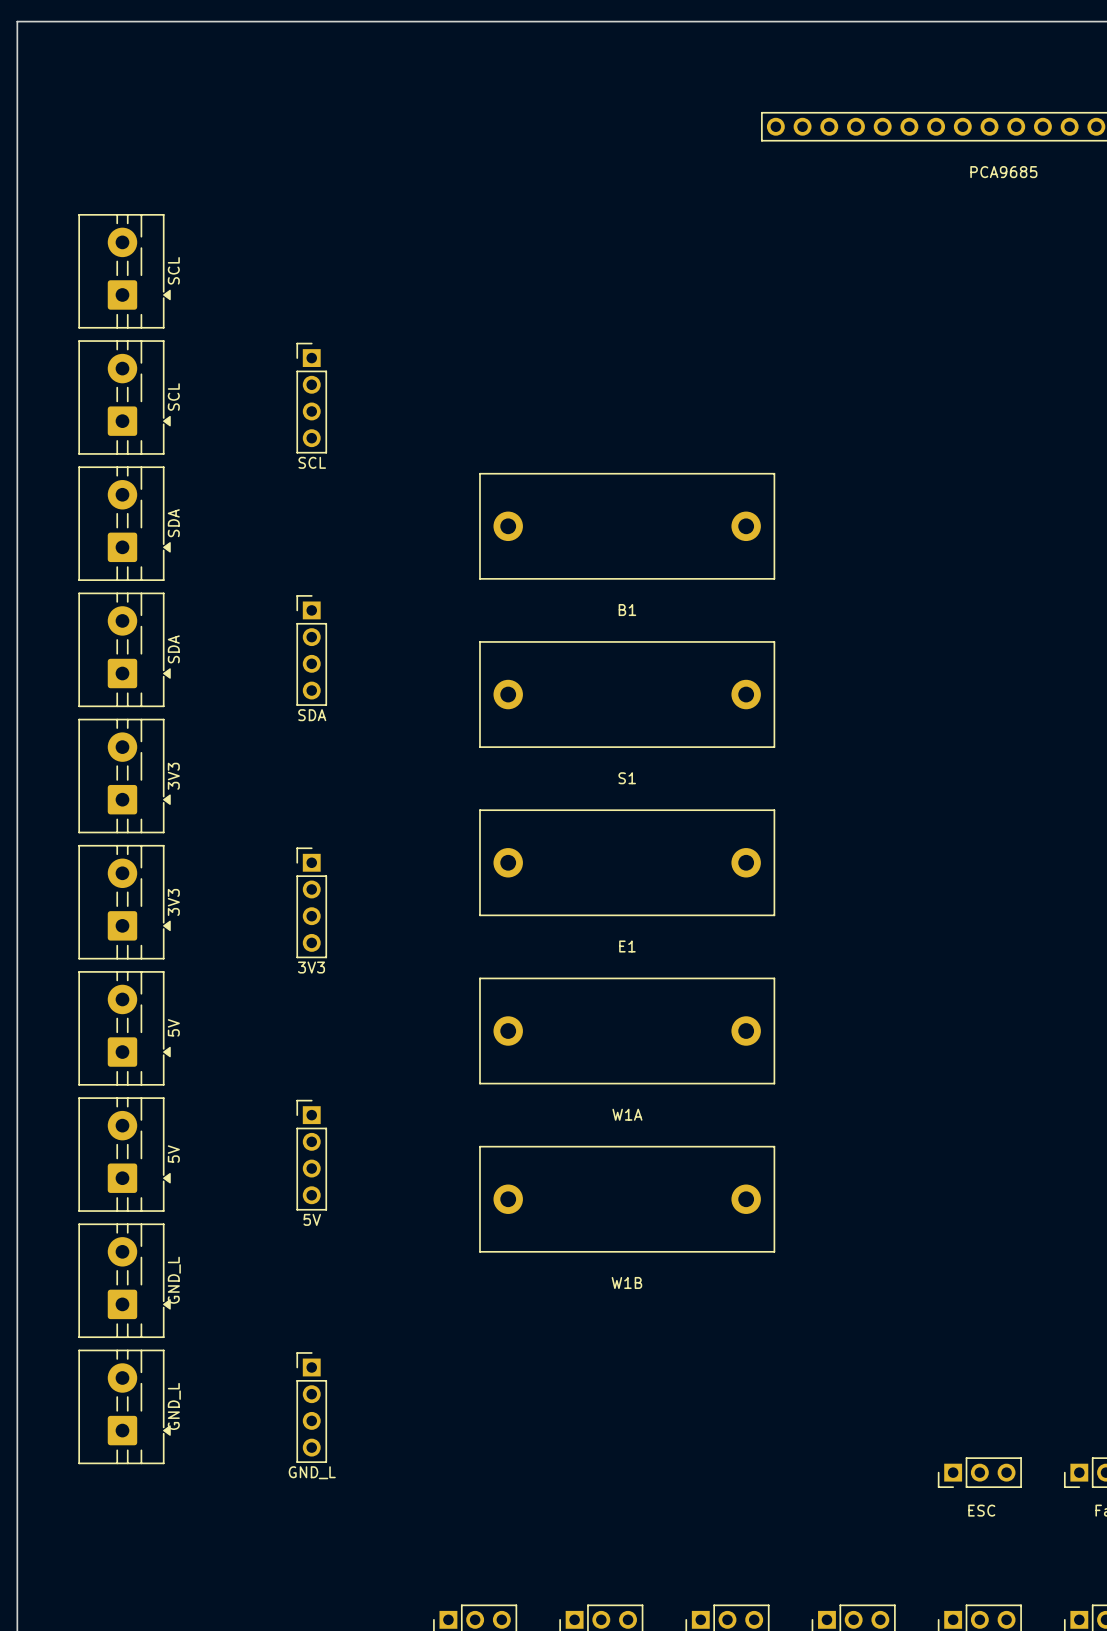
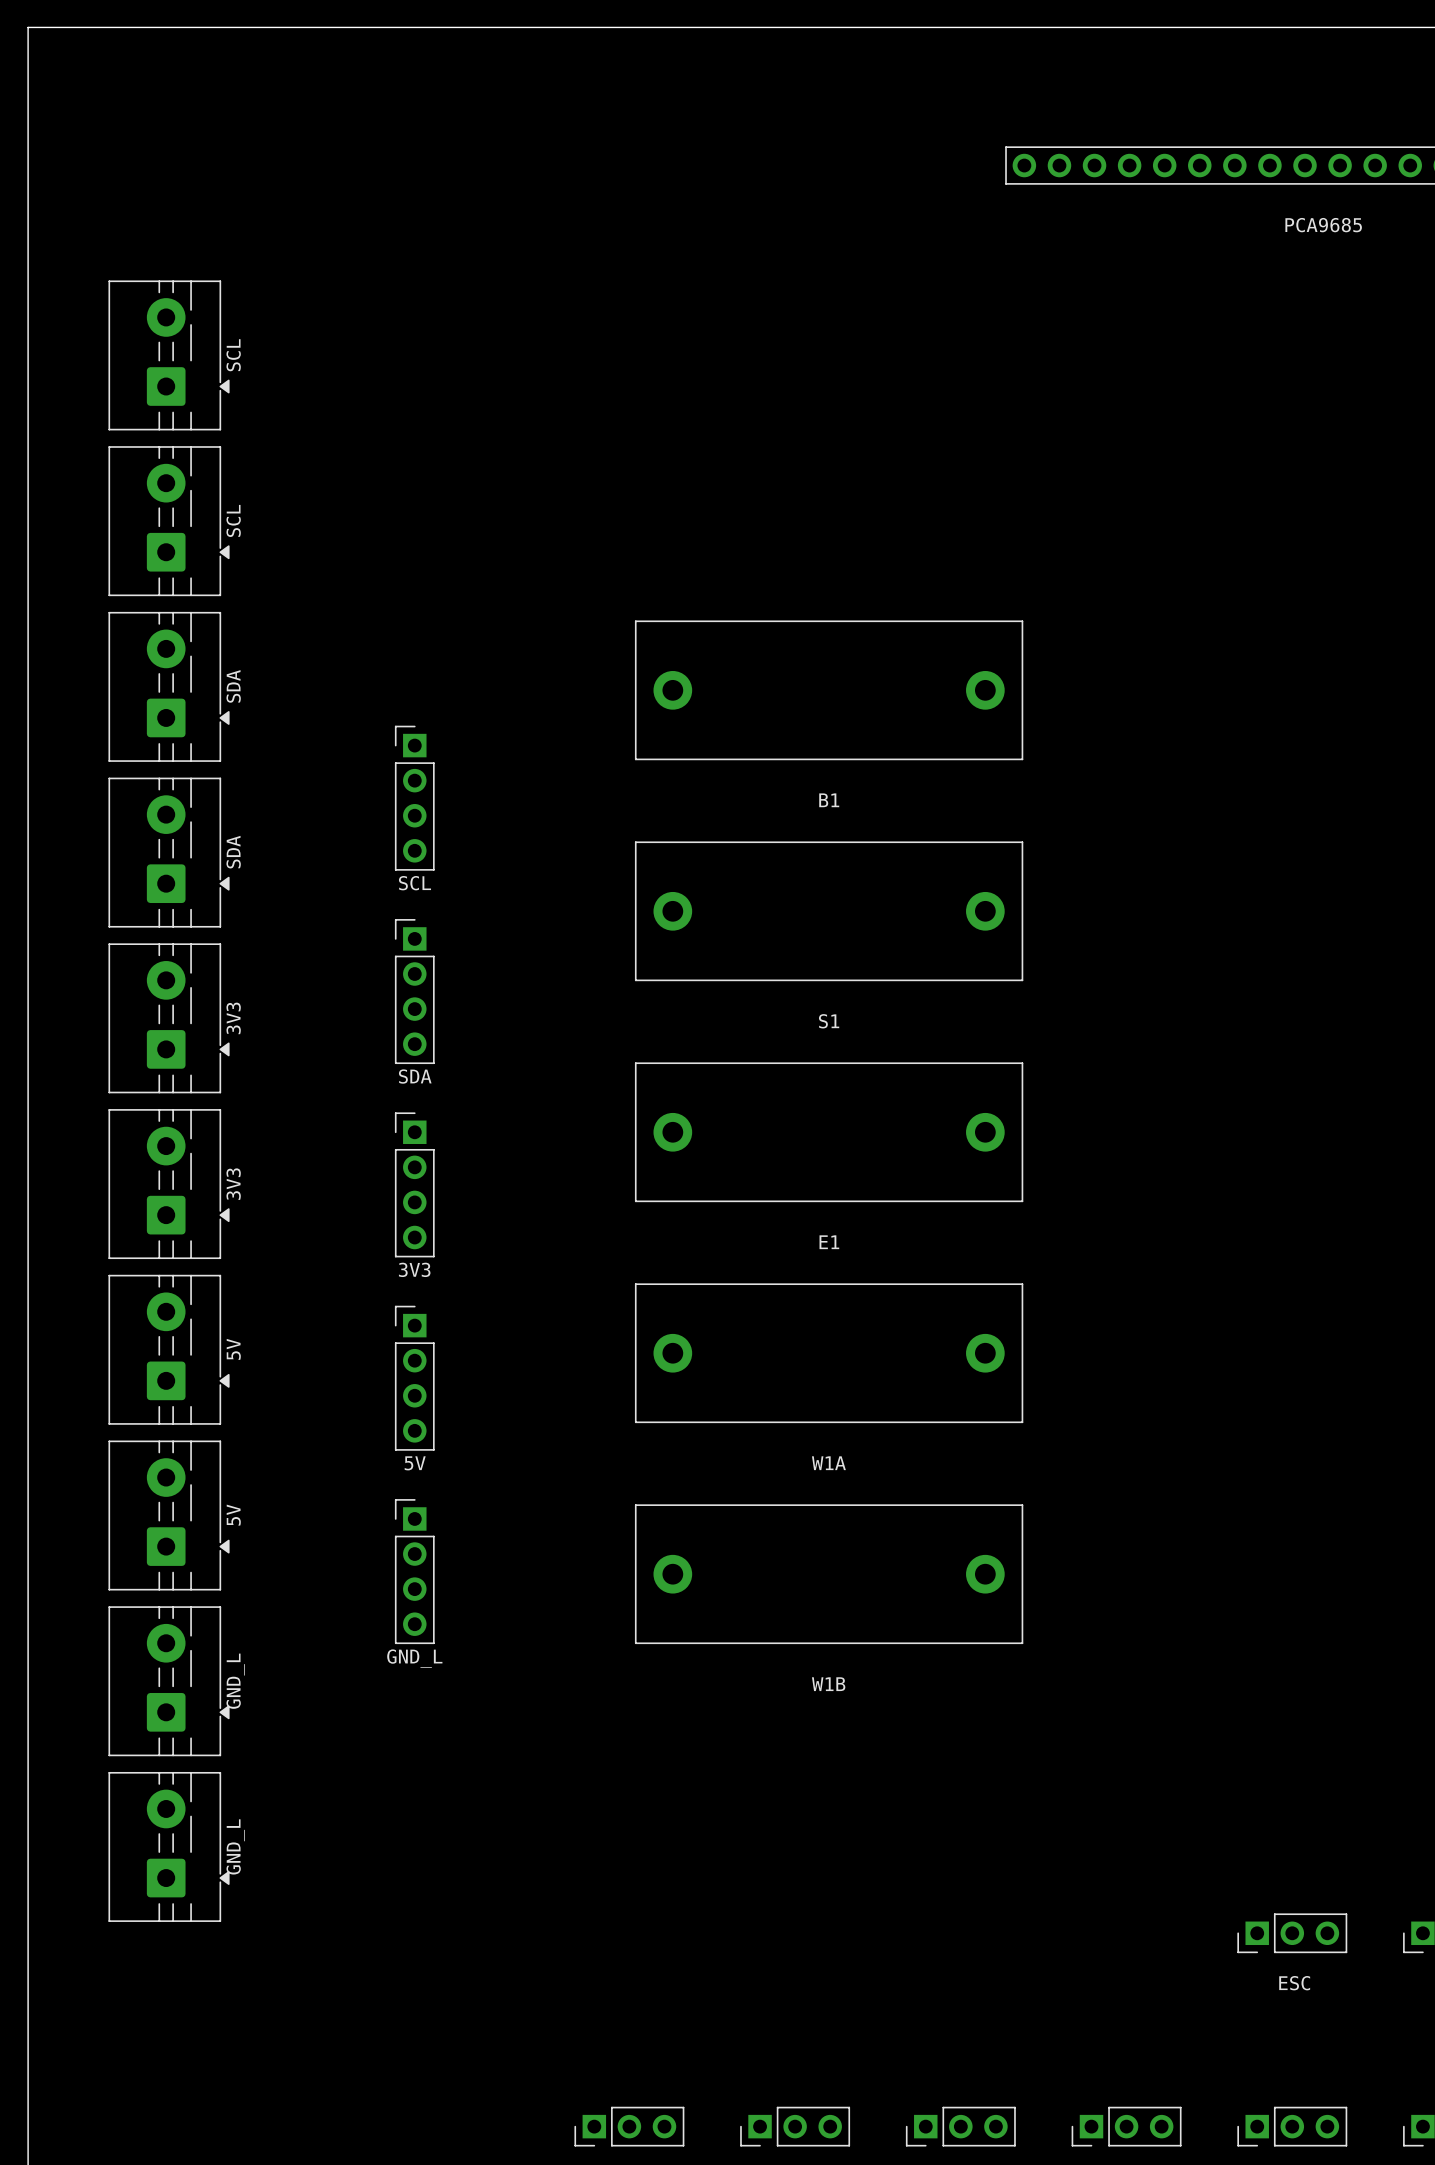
part position: (311, 398) -> (414, 798)
part position: (311, 650) -> (414, 991)
part position: (311, 1155) -> (414, 1378)
part position: (311, 1407) -> (414, 1571)

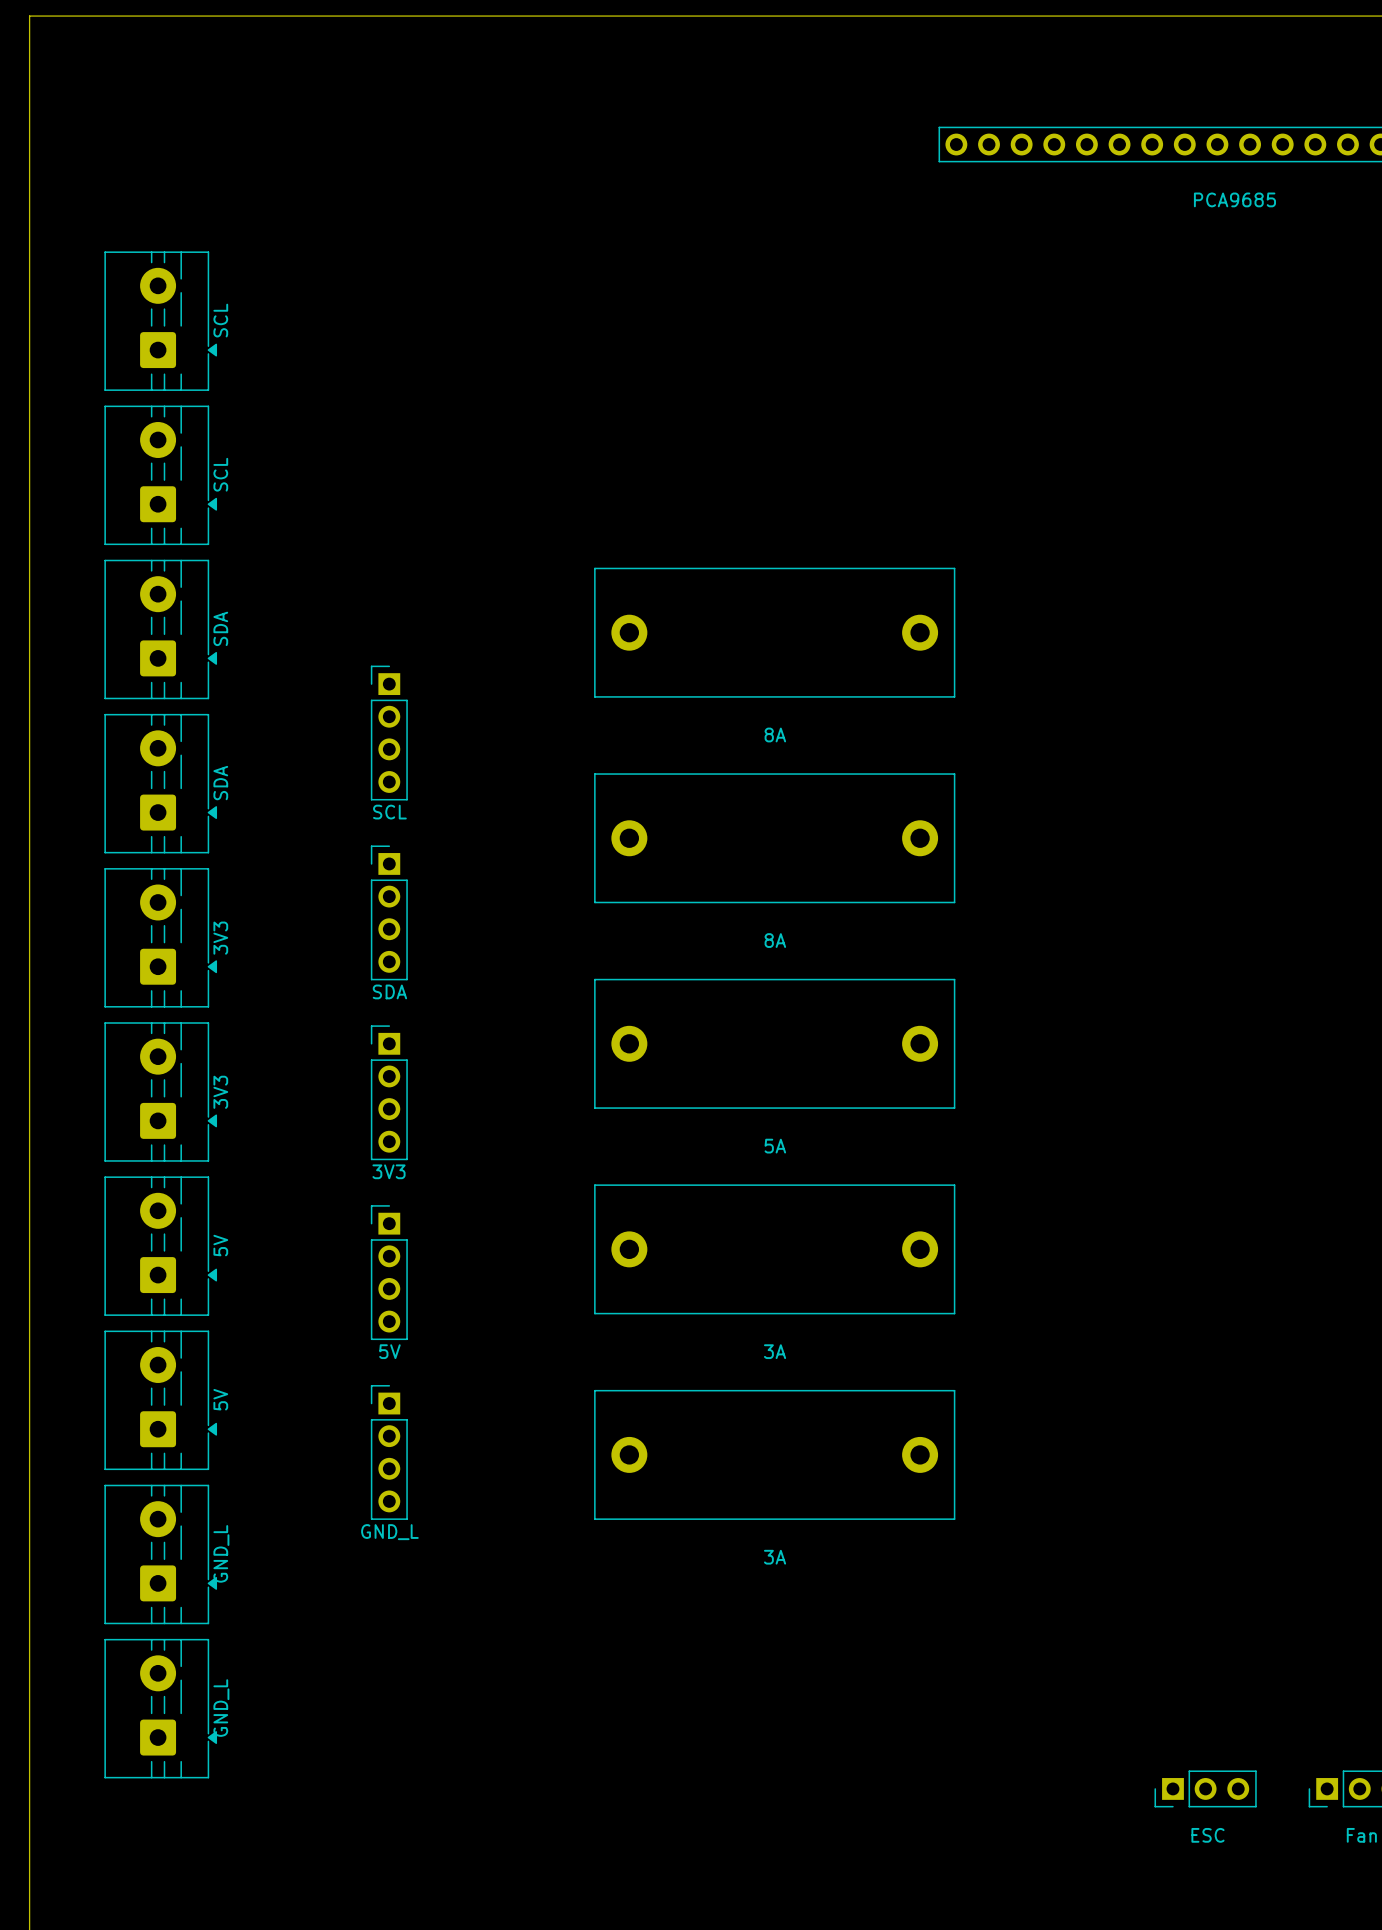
part value: B1 (829, 800) -> 8A (775, 735)
part value: S1 (829, 1021) -> 8A (775, 940)
part value: E1 (829, 1242) -> 5A (775, 1146)
part value: W1A (828, 1463) -> 3A (775, 1351)
part value: W1B (828, 1684) -> 3A (775, 1557)

